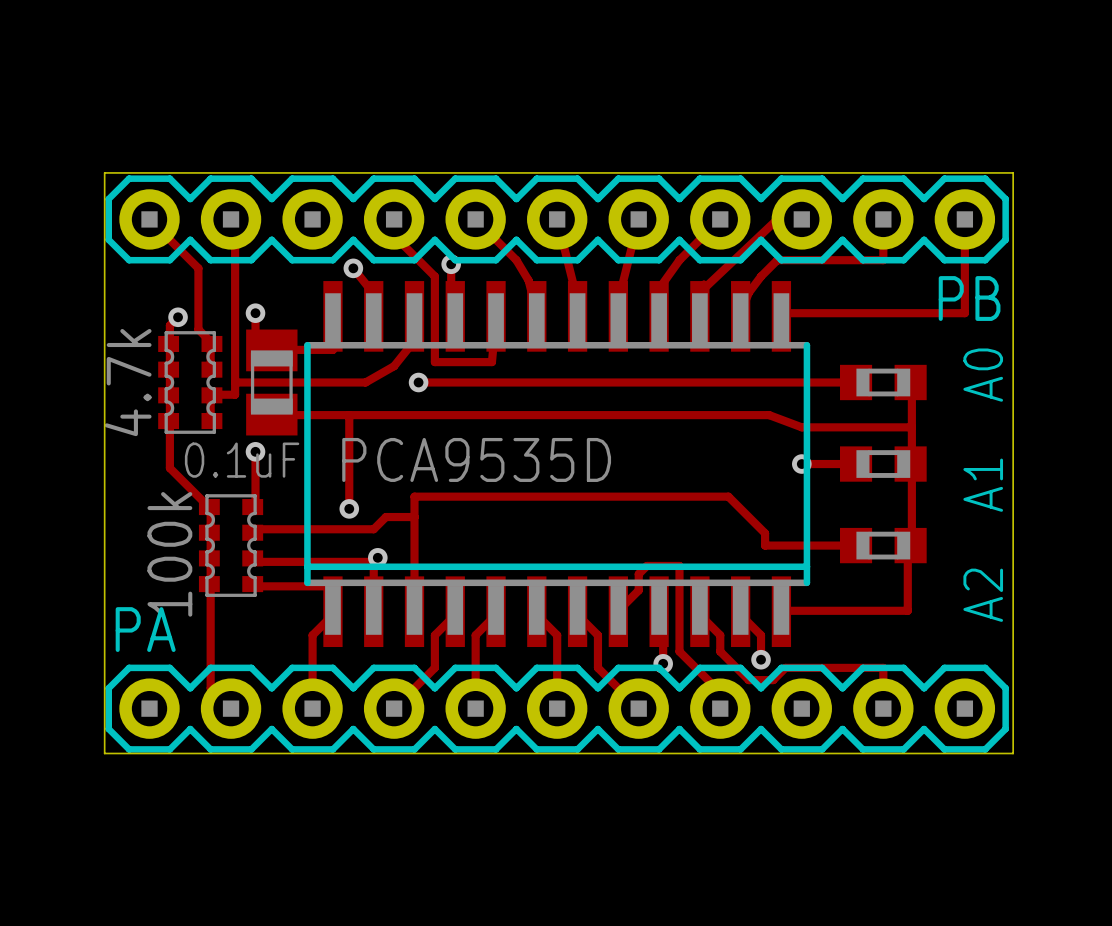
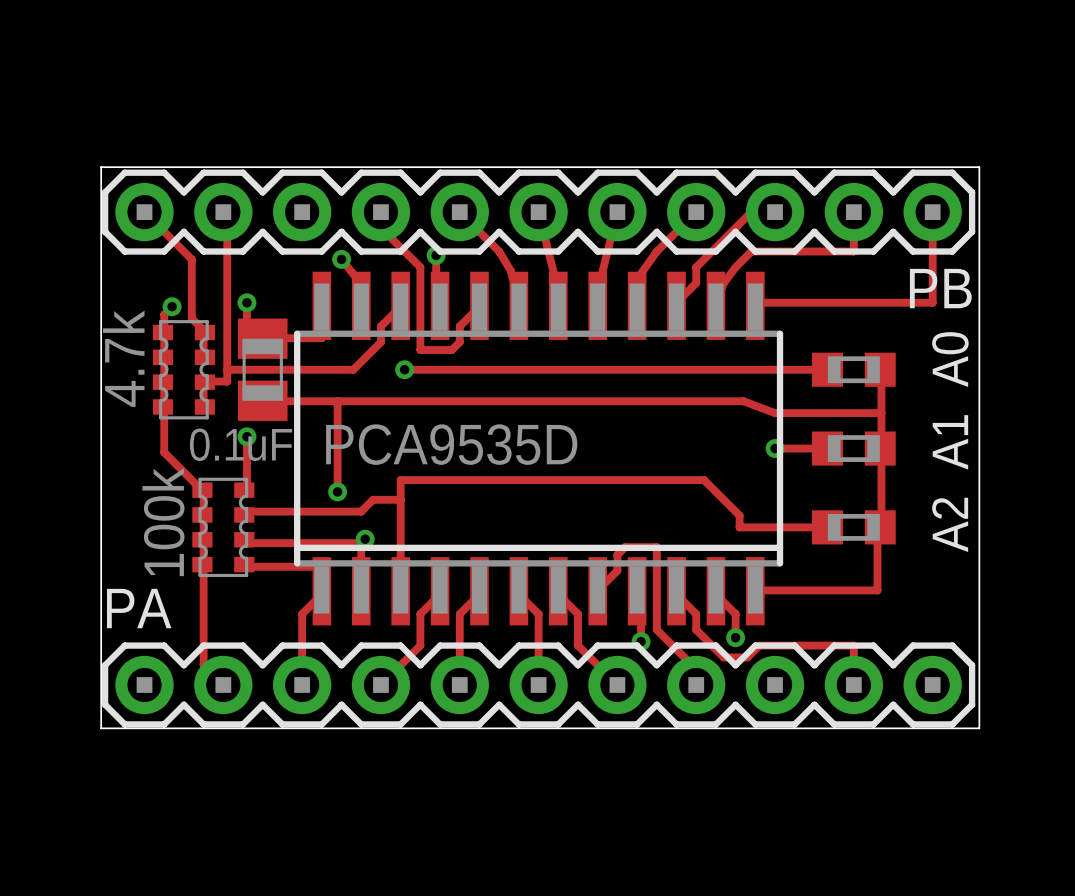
track: (777, 219) (703, 288) (703, 284) (699, 313) -> (751, 212) (696, 267) (696, 283) (676, 302)
track: (414, 317) (410, 345) (394, 366) (365, 382) -> (400, 306) (380, 326) (380, 342) (353, 369)
track: (496, 317) (491, 362) (467, 362) -> (479, 306) (459, 326) (459, 342) (451, 350)

